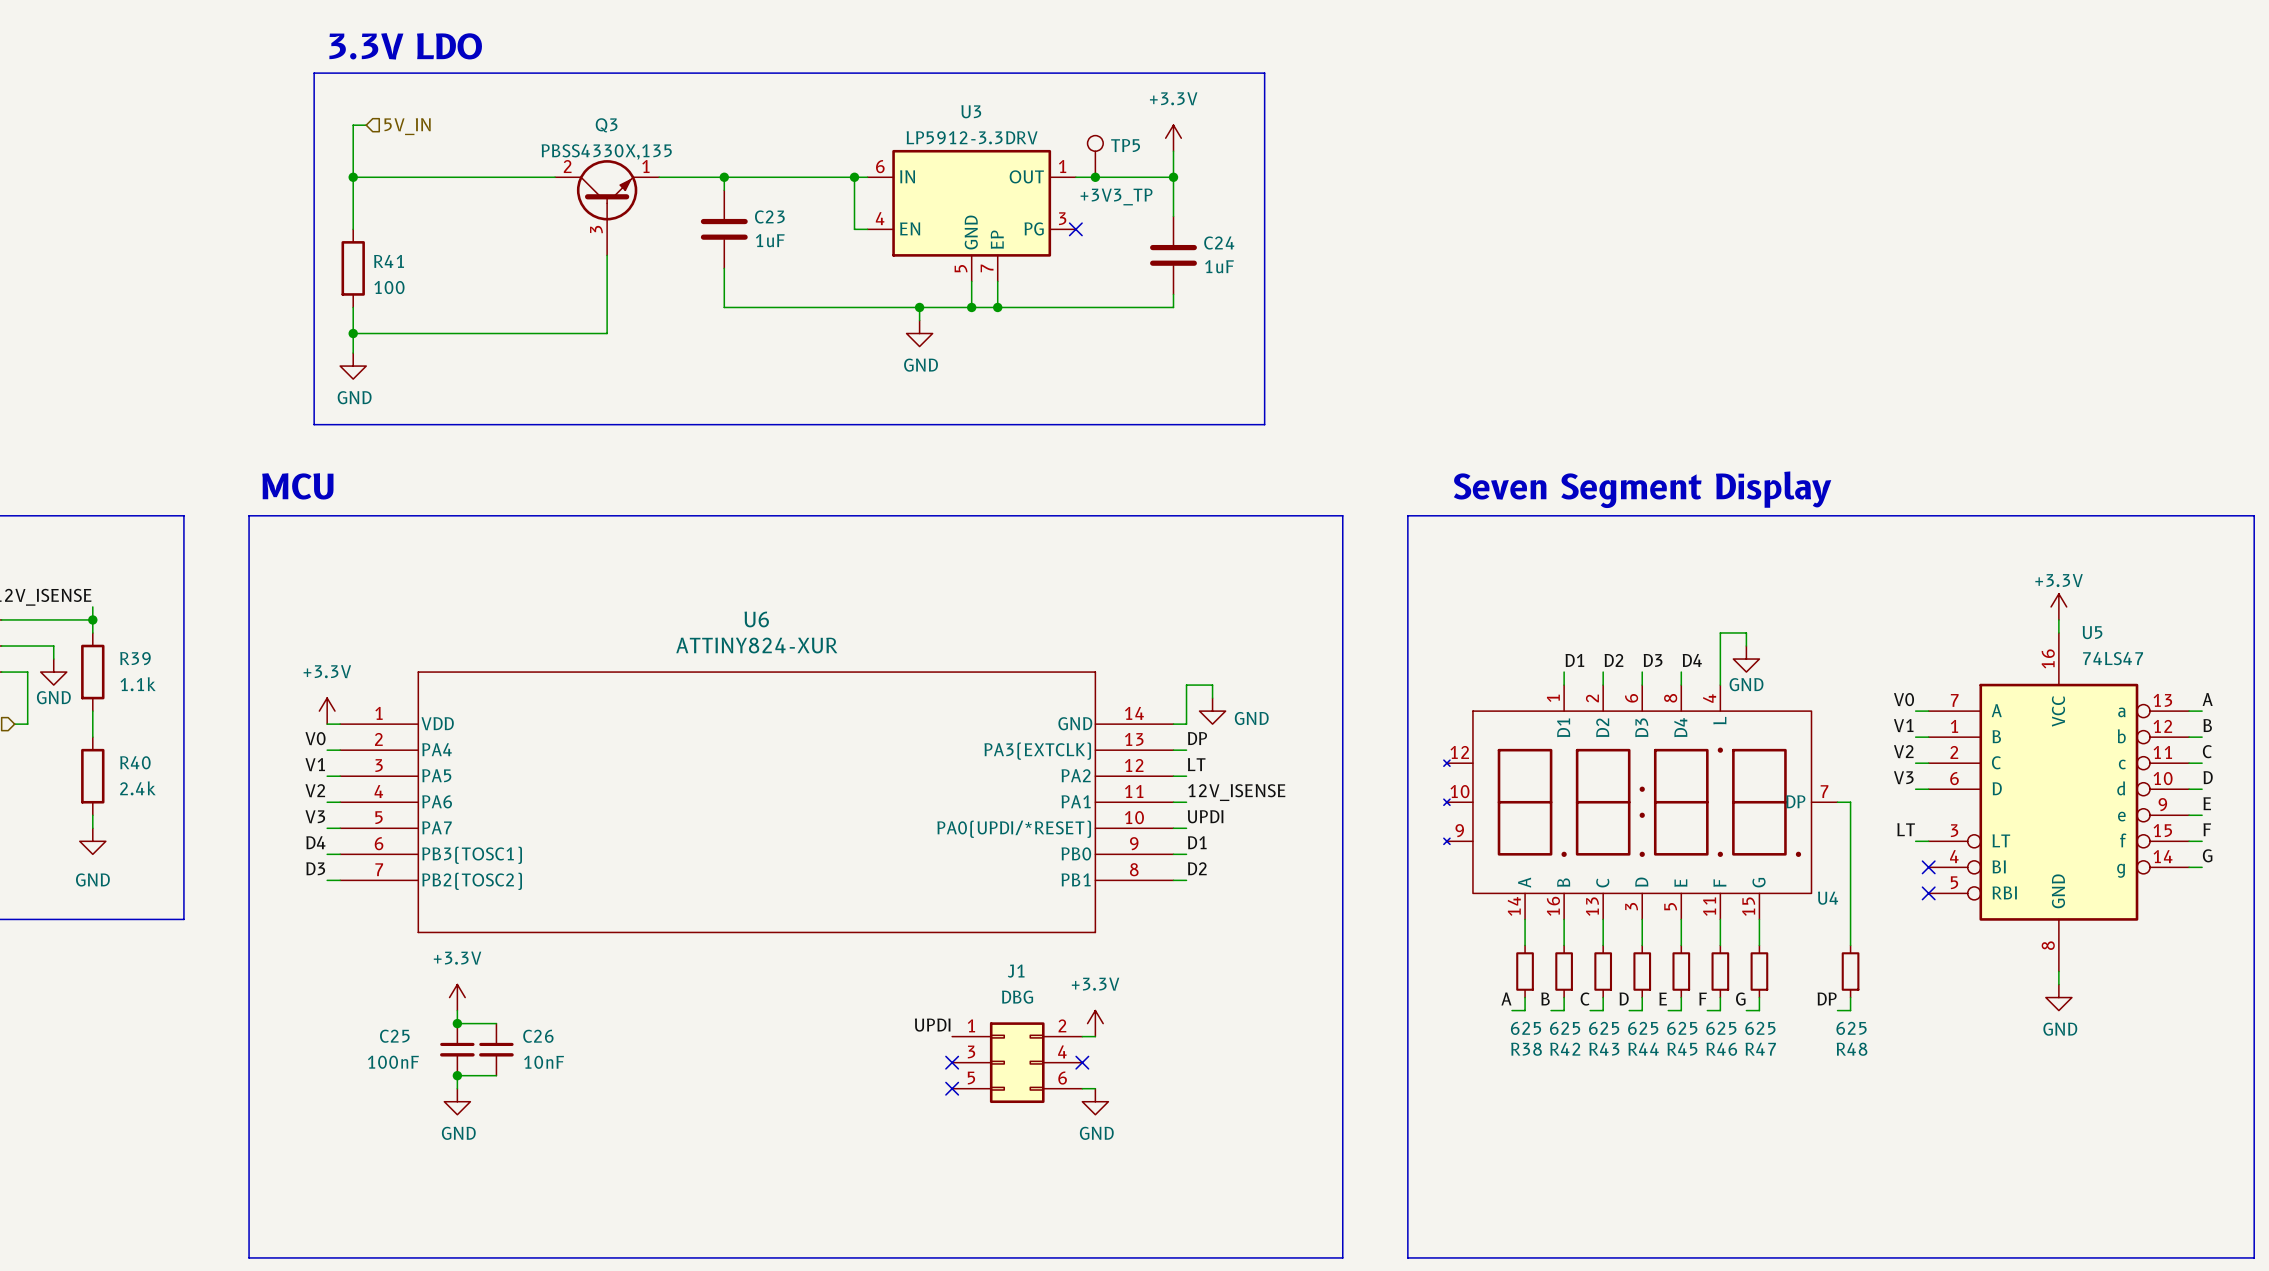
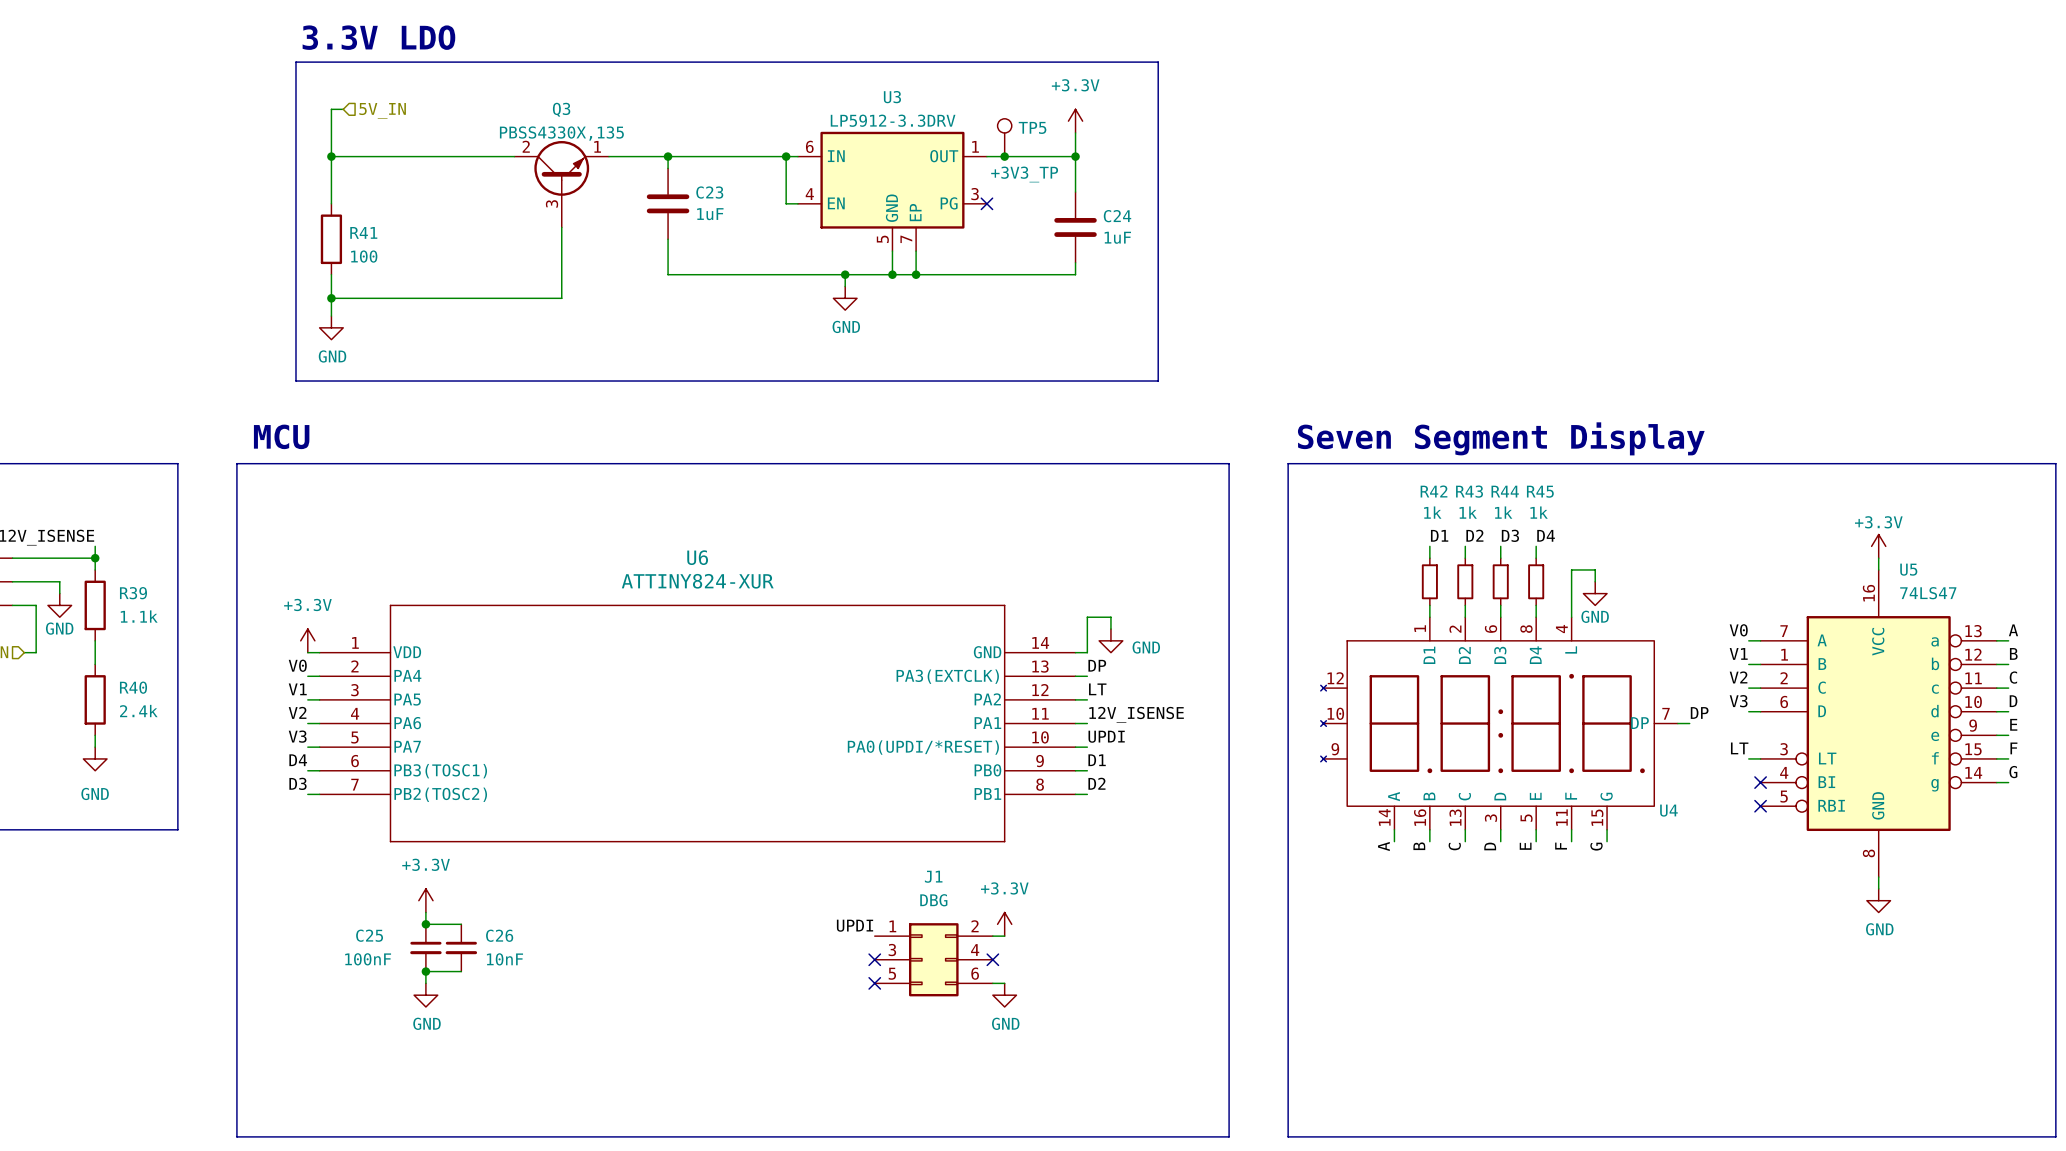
wire: none -> (1429, 546) (1429, 558)
wire: none -> (1465, 546) (1465, 558)
wire: none -> (1500, 546) (1500, 558)
wire: none -> (1536, 546) (1536, 558)
label position: D1 (1574, 660) -> D1 (1439, 535)
label position: D2 (1613, 660) -> D2 (1474, 535)
label position: D3 (1653, 660) -> D3 (1510, 535)
label position: D4 (1692, 660) -> D4 (1546, 535)
wire: (1850, 802) (1850, 945) -> none
wire: (1525, 932) (1525, 945) -> none
wire: (1564, 932) (1564, 945) -> none
wire: (1603, 932) (1603, 945) -> none
wire: (1642, 932) (1642, 945) -> none
wire: (1681, 932) (1681, 945) -> none
wire: (1720, 932) (1720, 945) -> none
wire: (1759, 932) (1759, 945) -> none
R38: 625 (1525, 971) -> none
R42 position: (1564, 971) -> (1429, 581)
R43 position: (1603, 971) -> (1465, 581)
R44 position: (1642, 971) -> (1500, 581)
R45 position: (1681, 971) -> (1536, 581)
R46: 625 (1720, 971) -> none
R47: 625 (1759, 971) -> none
R48: 625 (1850, 971) -> none
wire: (1525, 997) (1525, 1010) (1512, 1010) -> none
wire: (1564, 997) (1564, 1010) (1551, 1010) -> none
wire: (1603, 997) (1603, 1010) (1590, 1010) -> none
wire: (1642, 997) (1642, 1010) (1629, 1010) -> none
wire: (1681, 997) (1681, 1010) (1668, 1010) -> none
wire: (1720, 997) (1720, 1010) (1707, 1010) -> none
wire: (1759, 997) (1759, 1010) (1746, 1010) -> none
wire: (1850, 997) (1850, 1010) (1837, 1010) -> none
label rotation: 0° (1506, 998) -> 90° counterclockwise (1383, 846)
label position: A (1506, 998) -> A (1383, 846)
label position: DP (1827, 998) -> DP (1699, 712)
label rotation: 0° (1545, 999) -> 90° counterclockwise (1419, 846)
label position: B (1545, 999) -> B (1419, 846)
label rotation: 0° (1585, 999) -> 90° counterclockwise (1454, 846)
label position: C (1585, 999) -> C (1454, 846)
label rotation: 0° (1624, 999) -> 90° counterclockwise (1490, 846)
label position: D (1624, 999) -> D (1490, 846)
label rotation: 0° (1663, 999) -> 90° counterclockwise (1525, 846)
label position: E (1663, 999) -> E (1525, 846)
label rotation: 0° (1703, 999) -> 90° counterclockwise (1561, 846)
label position: F (1703, 999) -> F (1561, 846)
label rotation: 0° (1740, 999) -> 90° counterclockwise (1596, 846)
label position: G (1740, 999) -> G (1596, 846)
R42 value: 625 (1565, 1028) -> 1k (1432, 512)
R43 value: 625 (1604, 1028) -> 1k (1468, 512)
R44 value: 625 (1643, 1028) -> 1k (1503, 512)
R45 value: 625 (1682, 1028) -> 1k (1539, 512)
R42 name position: R42 (1565, 1049) -> R42 (1434, 491)
R43 name position: R43 (1604, 1049) -> R43 (1469, 491)
R44 name position: R44 (1643, 1049) -> R44 (1505, 491)
R45 name position: R45 (1682, 1049) -> R45 (1540, 491)

